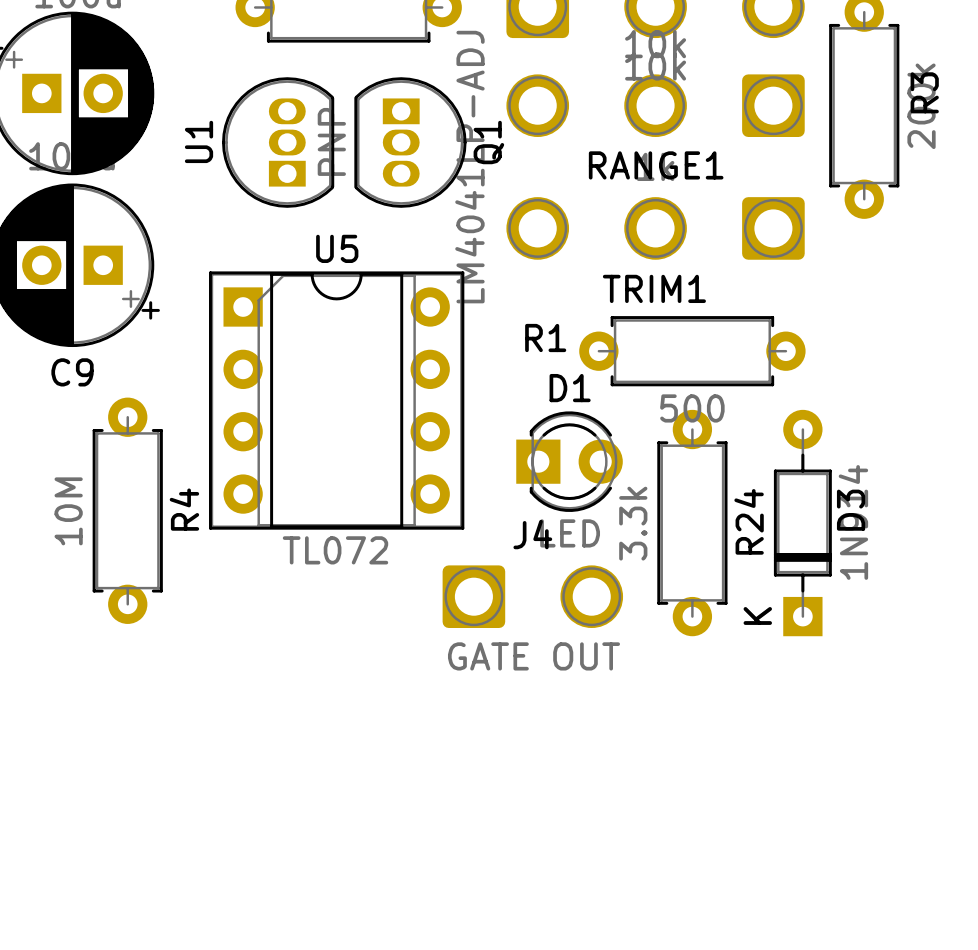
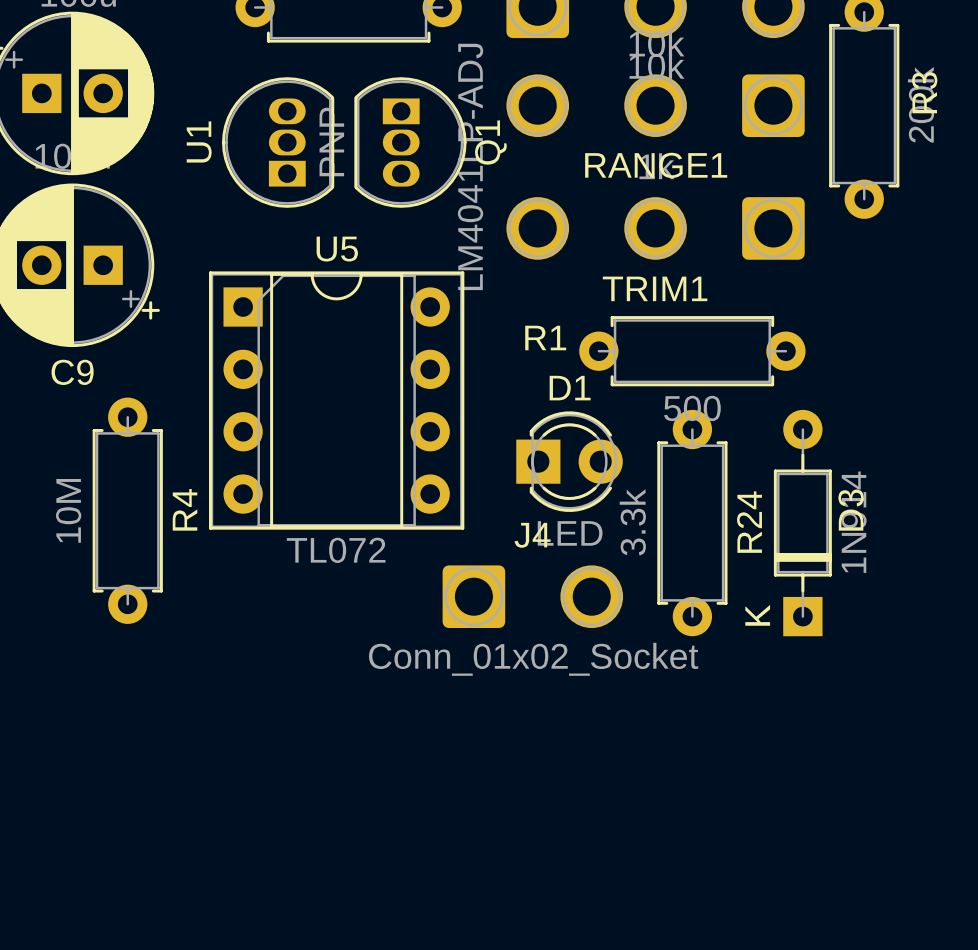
J4 value: GATE OUT (533, 656) -> Conn_01x02_Socket (533, 659)

